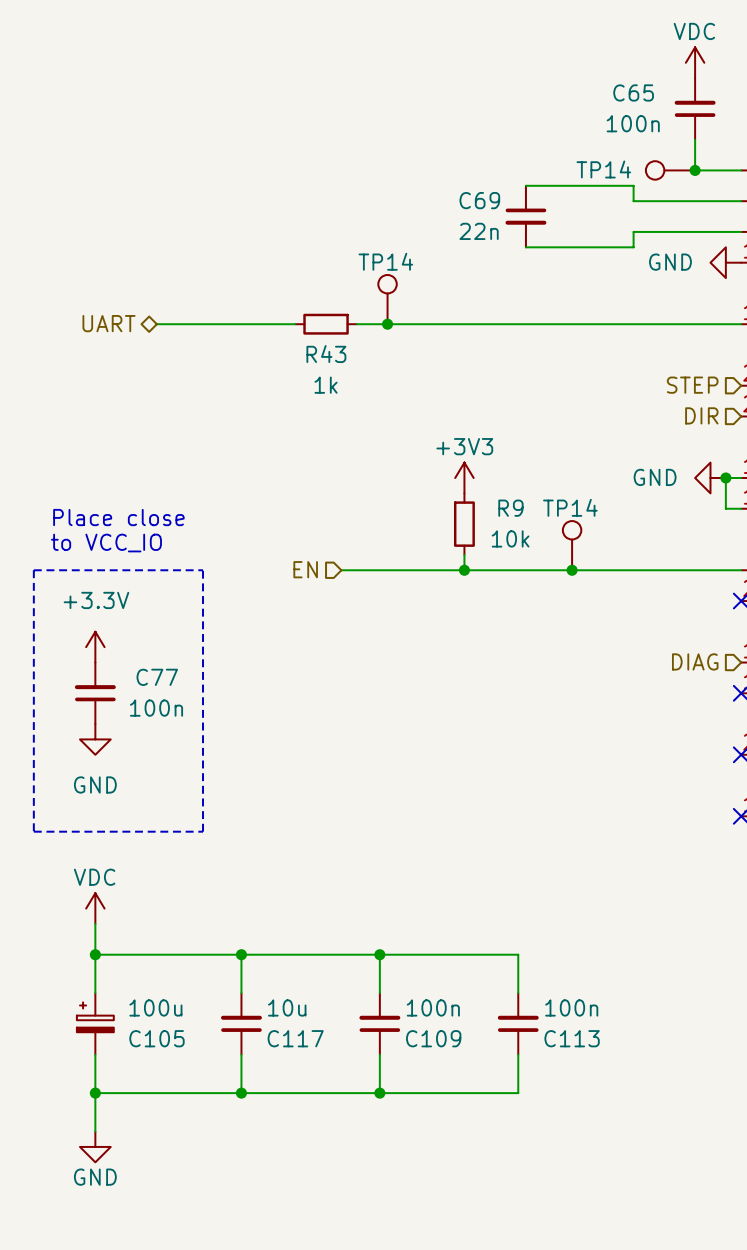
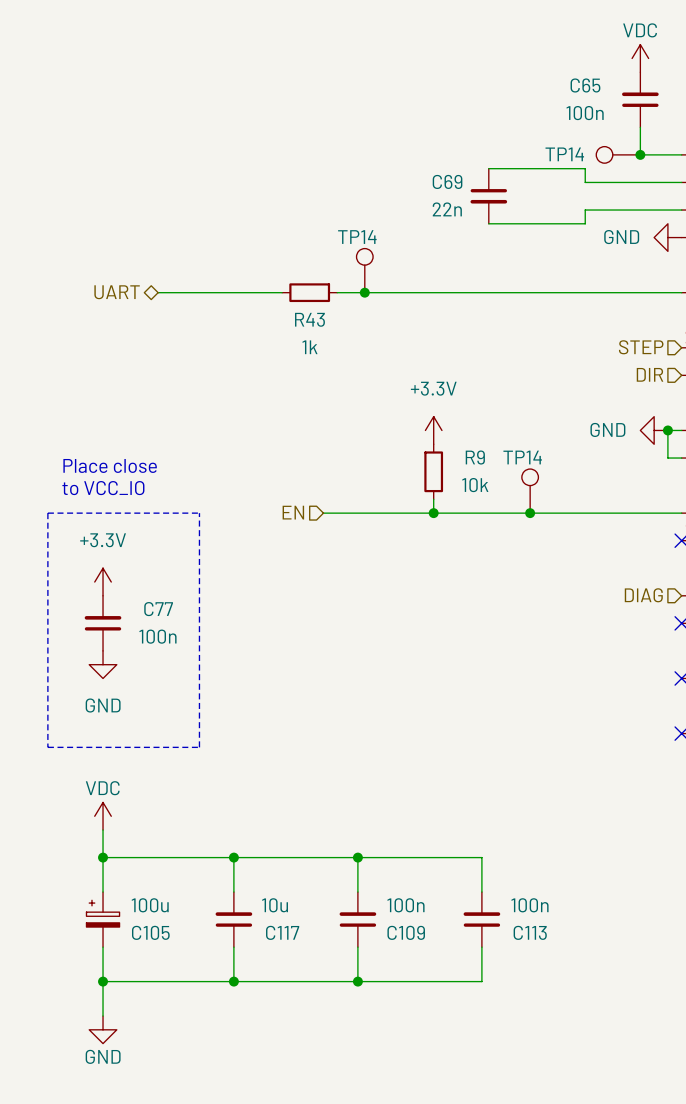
power symbol: +3V3 (464, 477) -> +3.3V (433, 430)

